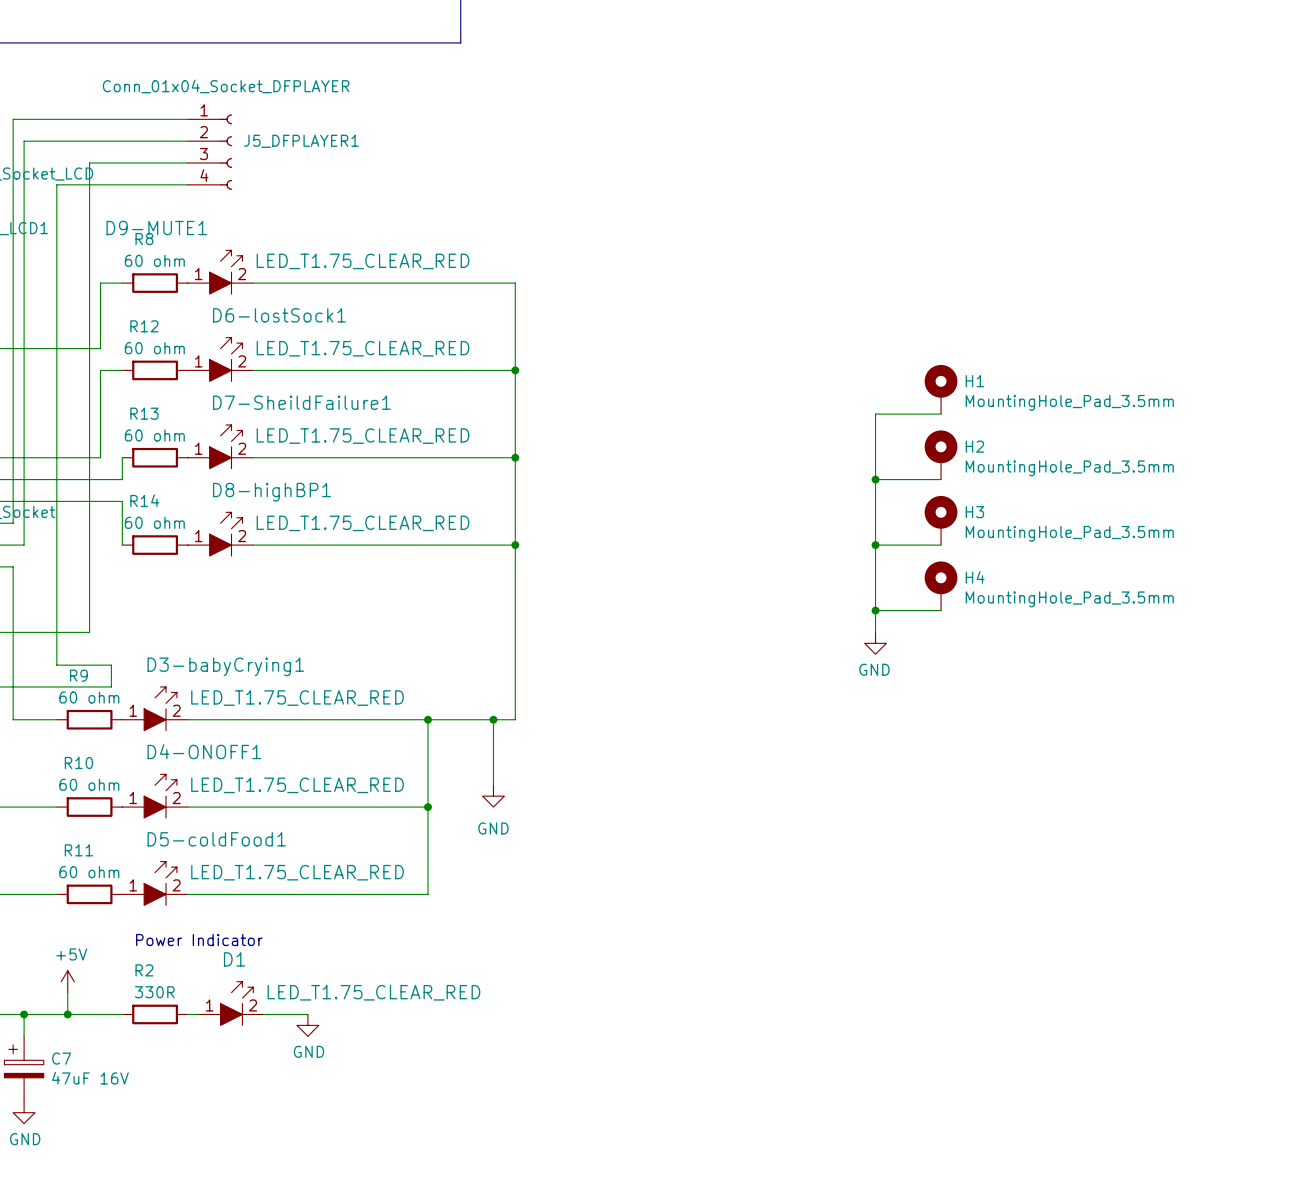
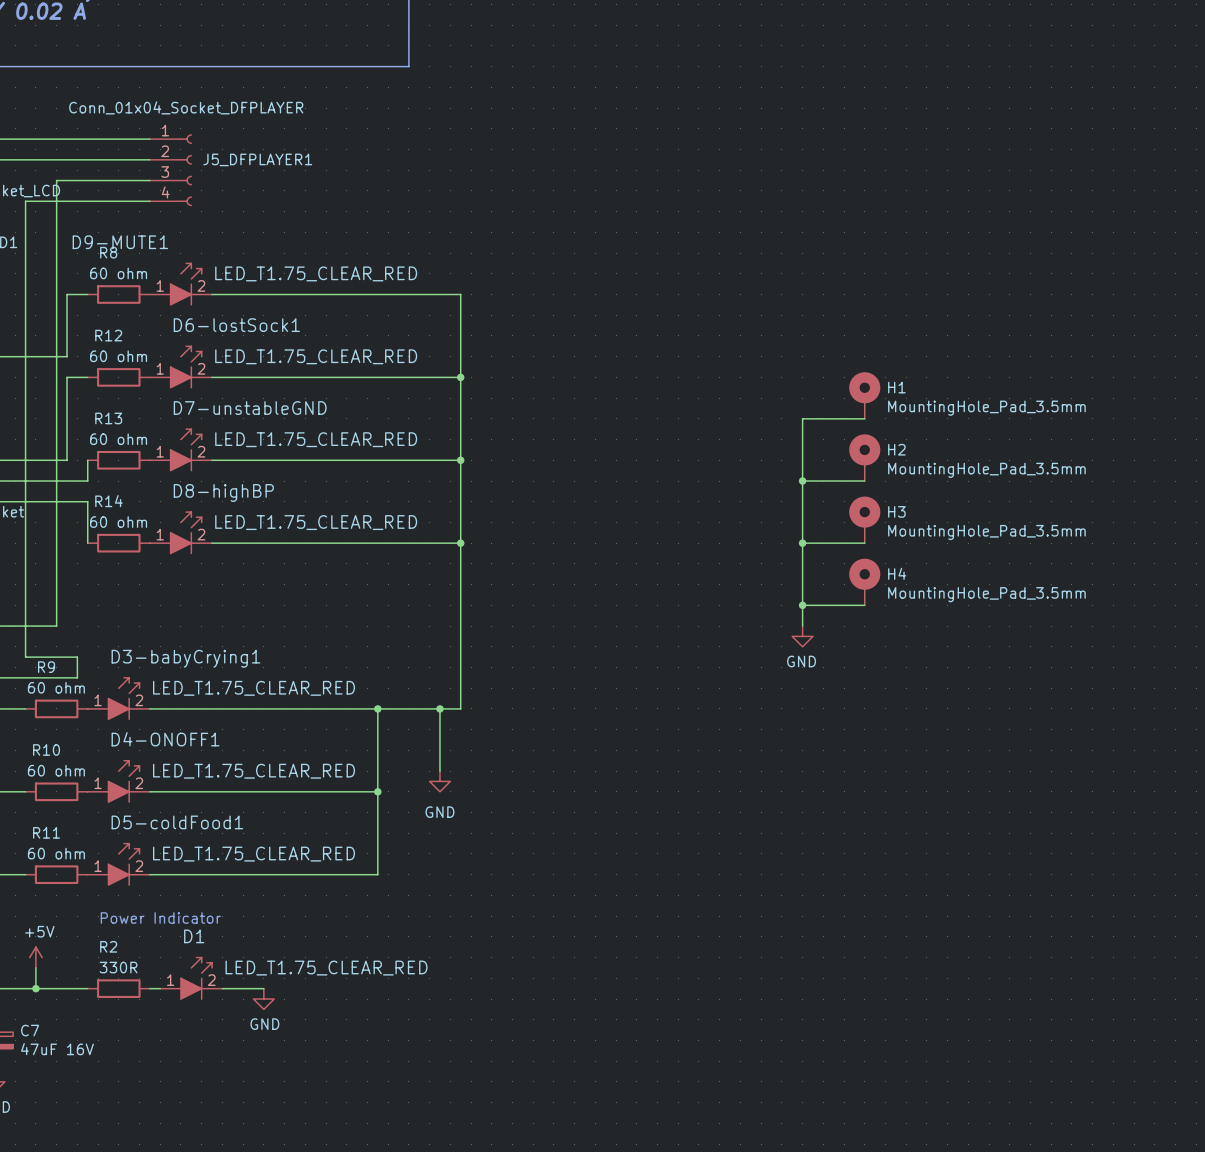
D7-SheildFailure1 name: D7-SheildFailure1 (301, 402) -> D7-unstableGND (250, 408)
D8-highBP1 name: D8-highBP1 (271, 492) -> D8-highBP (223, 492)

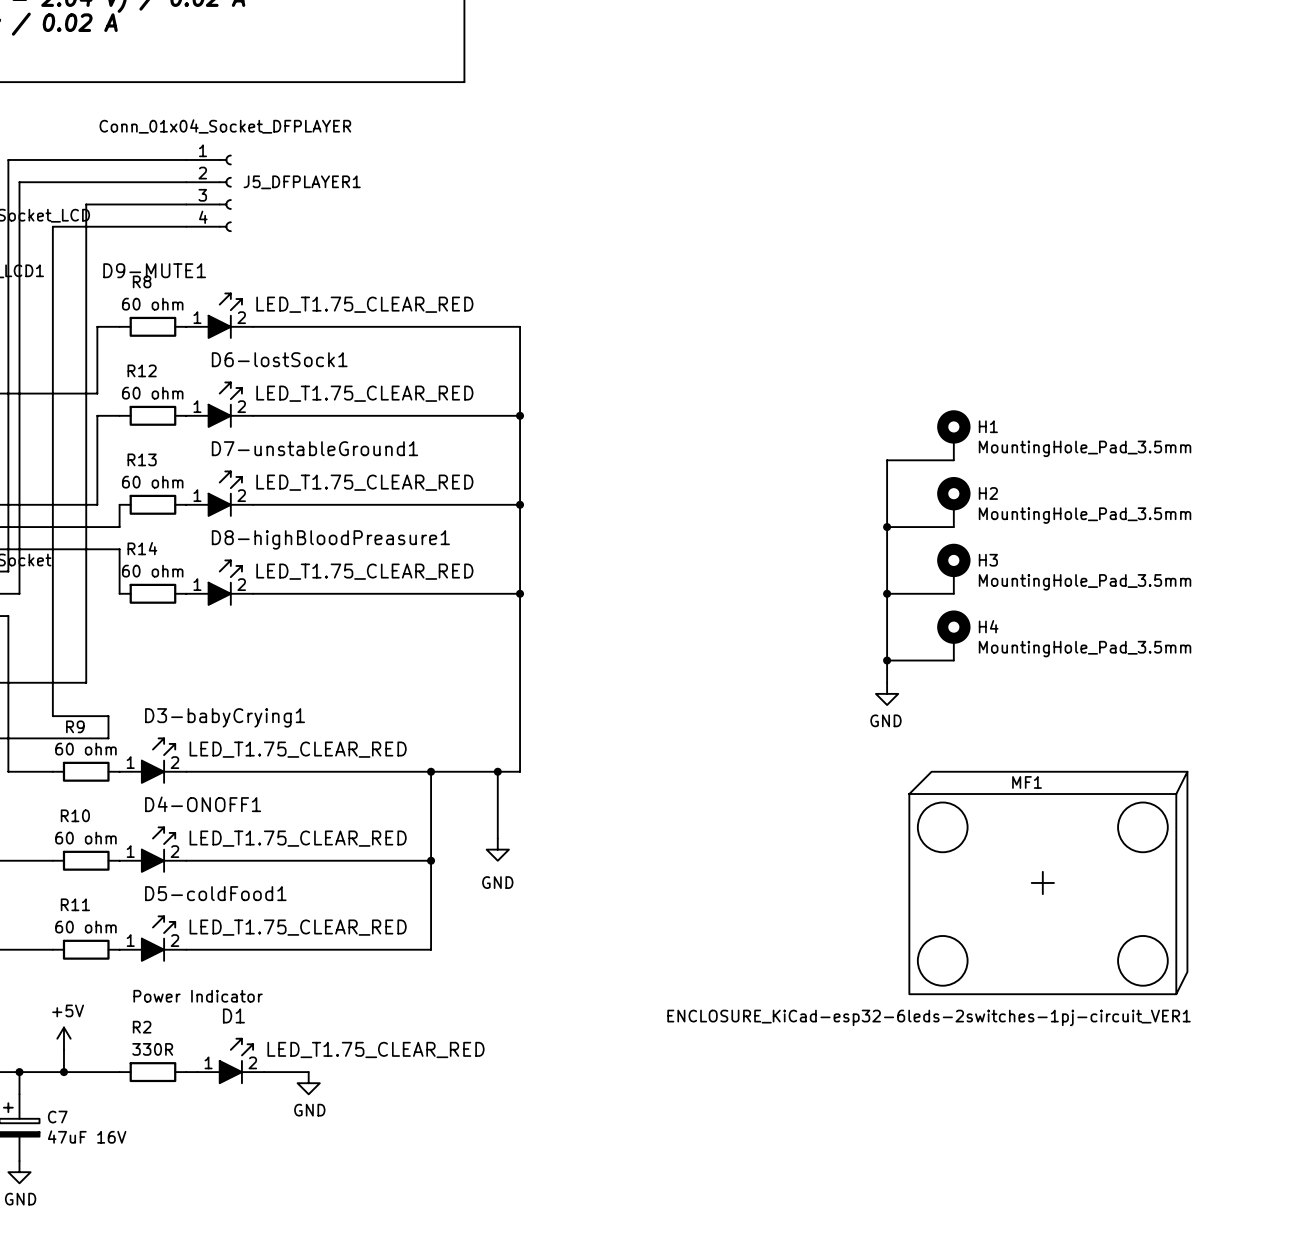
D7-unstableGND name: D7-unstableGND (250, 408) -> D7-unstableGround1 (314, 448)
D8-highBP name: D8-highBP (223, 492) -> D8-highBloodPreasure1 (330, 539)
MF1: none -> ENCLOSURE_KiCad-esp32-6leds-2switches-1pj-circuit_VER1 (1048, 882)

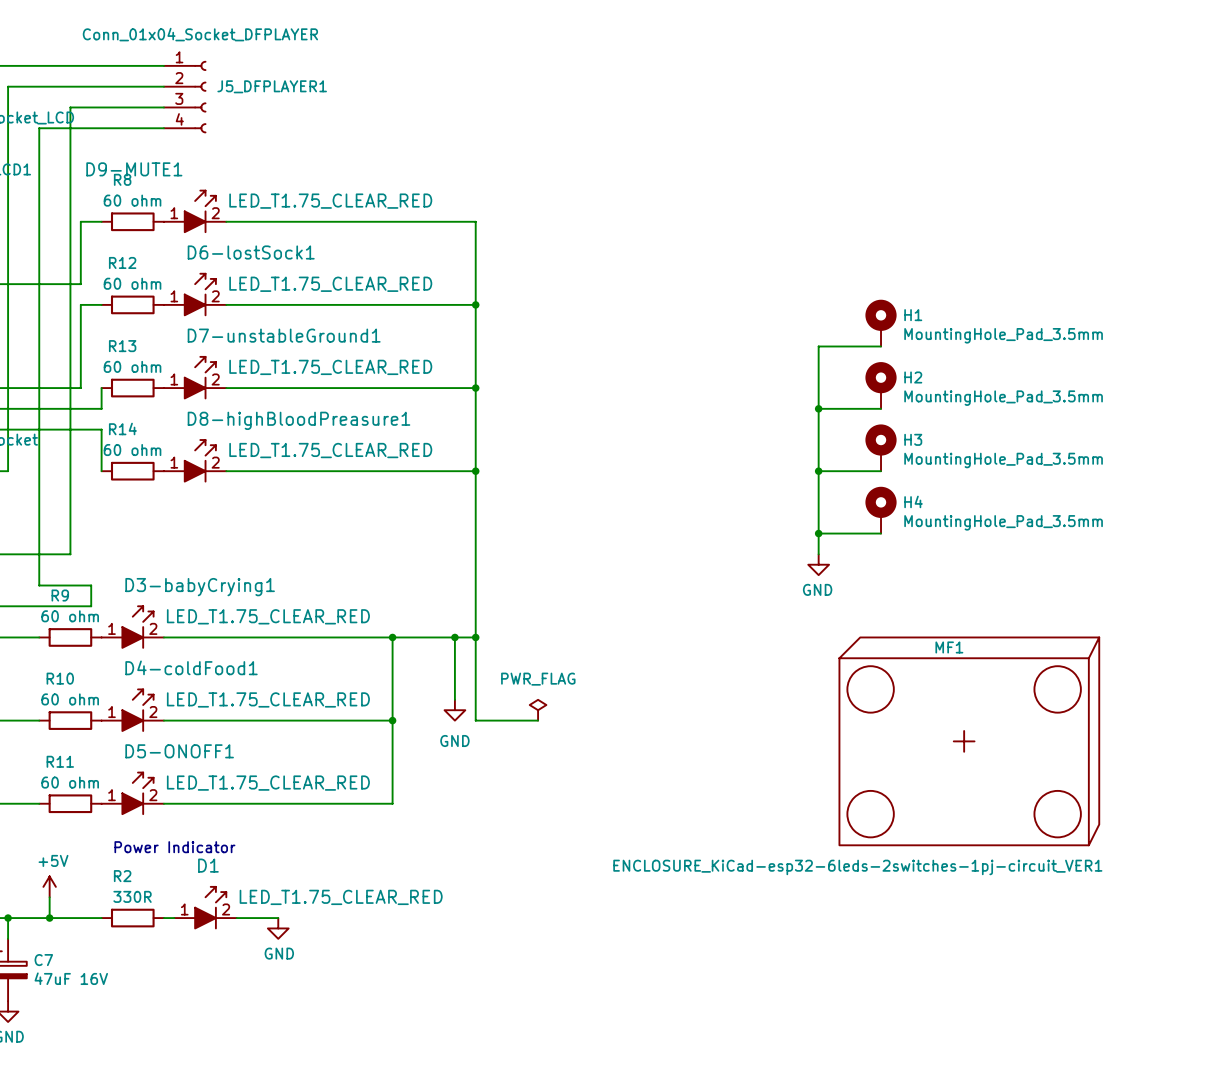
wire: none -> (475, 637) (475, 720) (538, 720)
junction: none -> (475, 637)
D4-ONOFF1 name: D4-ONOFF1 (203, 804) -> D4-coldFood1 (191, 667)
power symbol: none -> PWR_FLAG (538, 710)
D5-coldFood1 name: D5-coldFood1 (215, 893) -> D5-ONOFF1 (179, 751)

